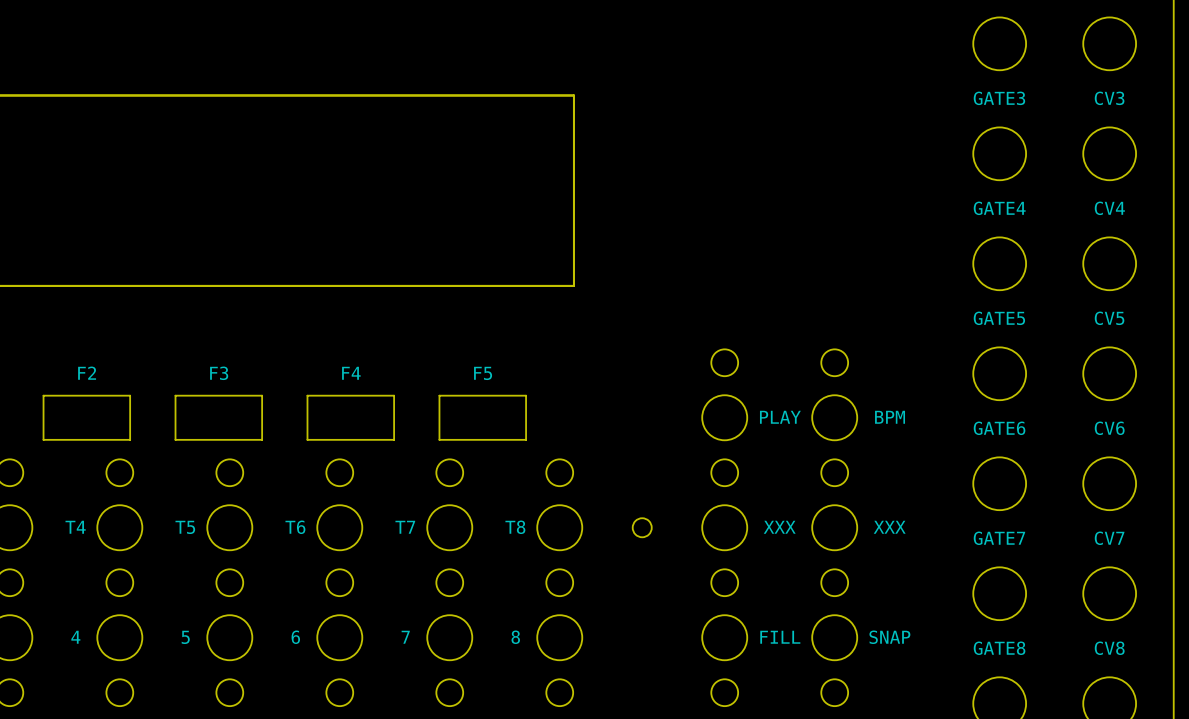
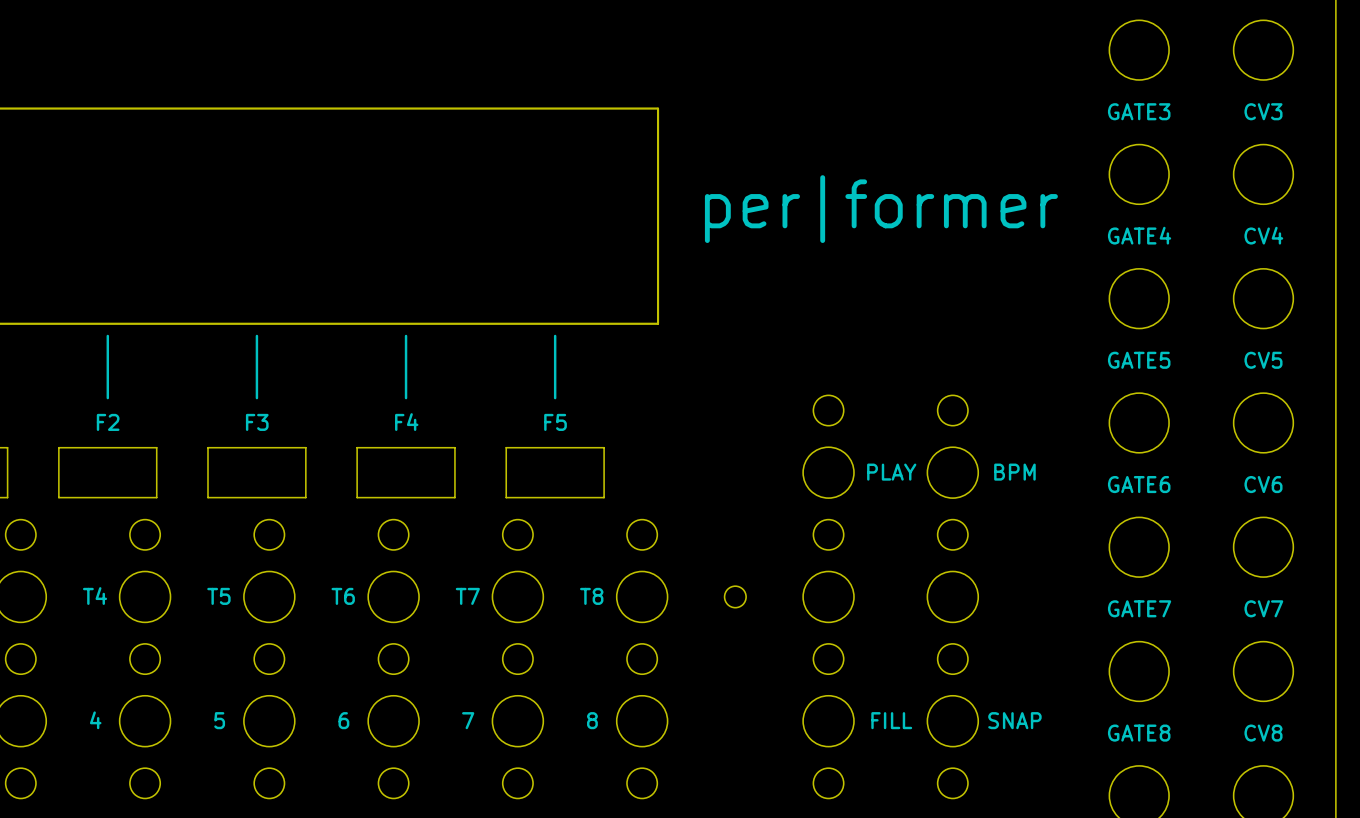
text: none -> per|former (881, 209)
line: none -> (107, 335) (107, 398)
line: none -> (256, 335) (256, 398)
line: none -> (406, 335) (406, 398)
line: none -> (555, 335) (555, 398)
XXX name: XXX (779, 527) -> none
XXX name: XXX (889, 527) -> none

